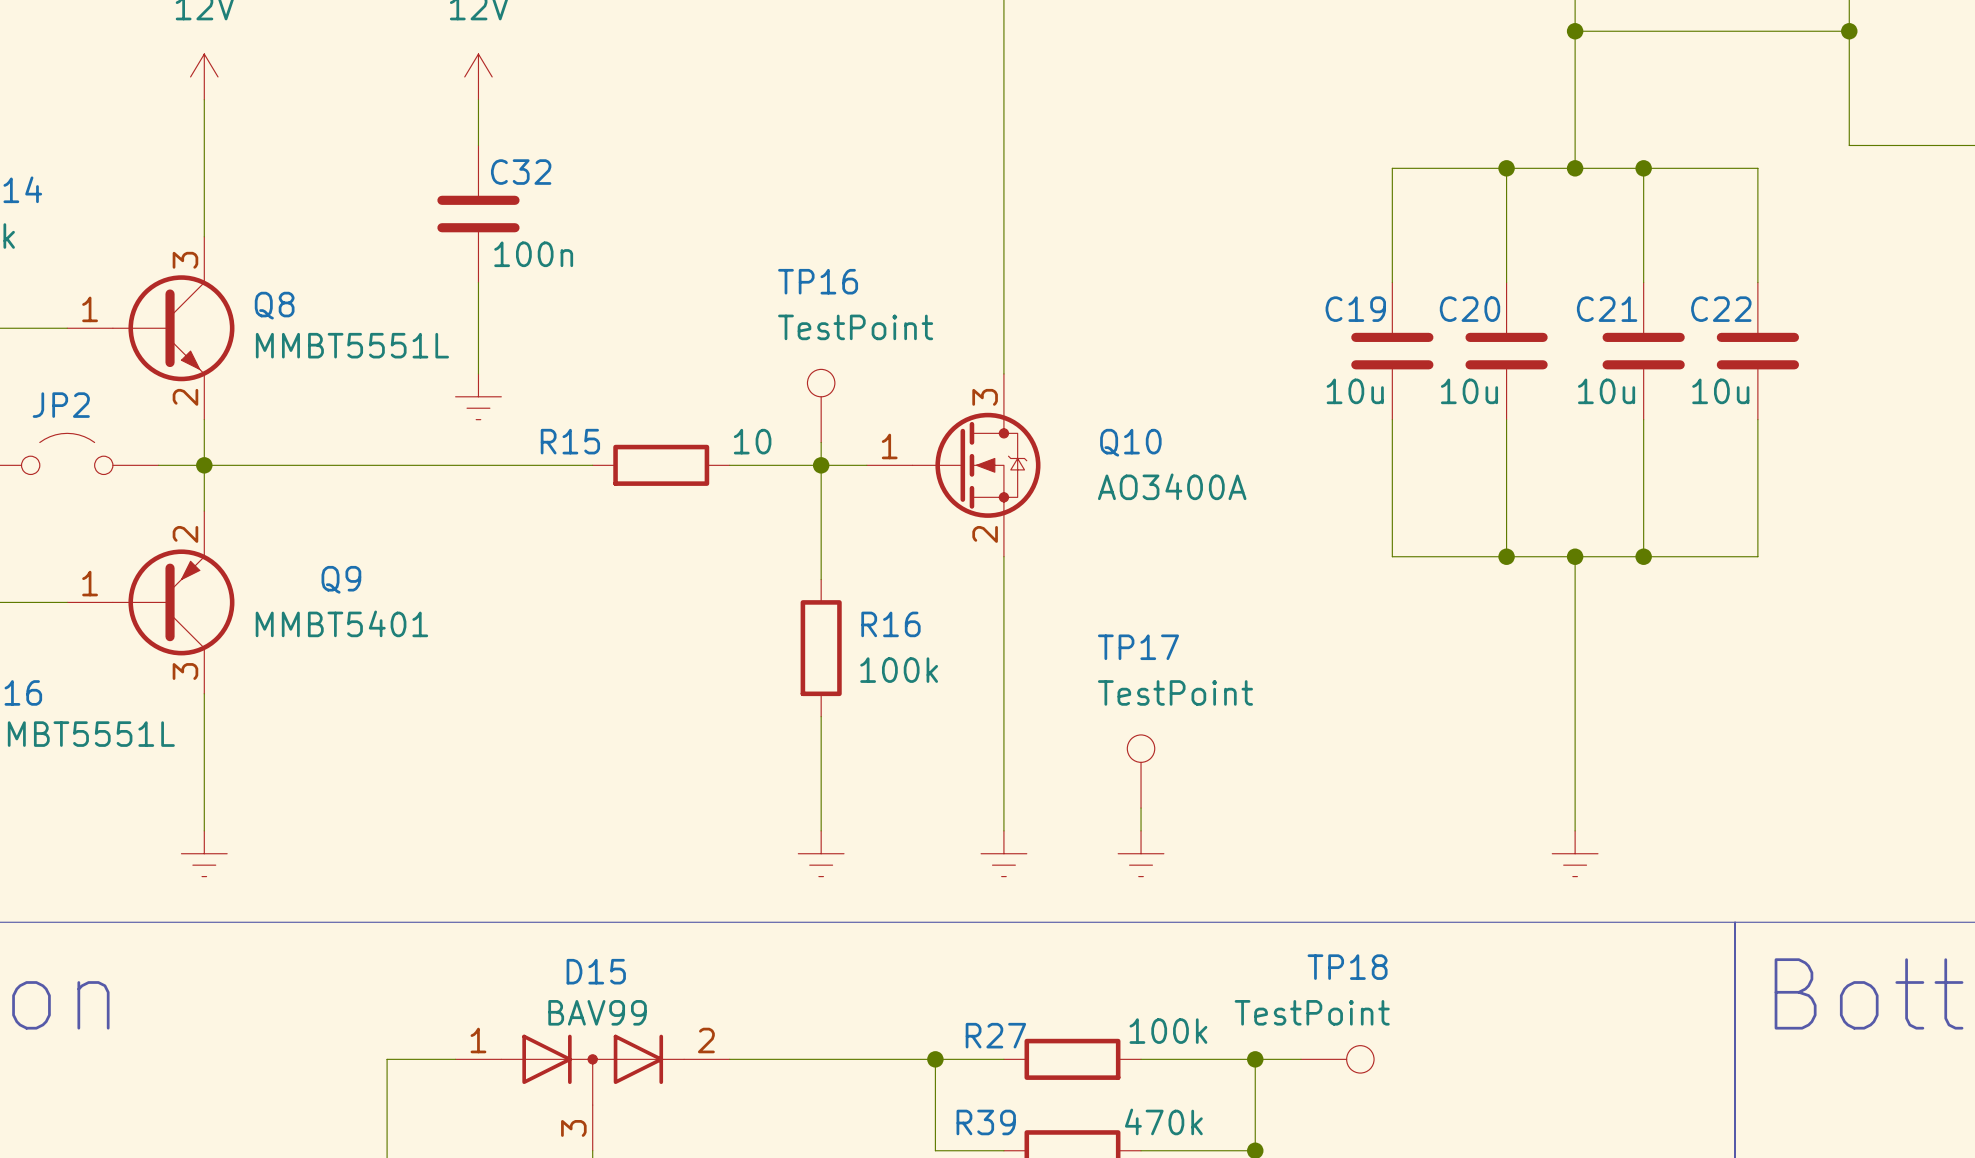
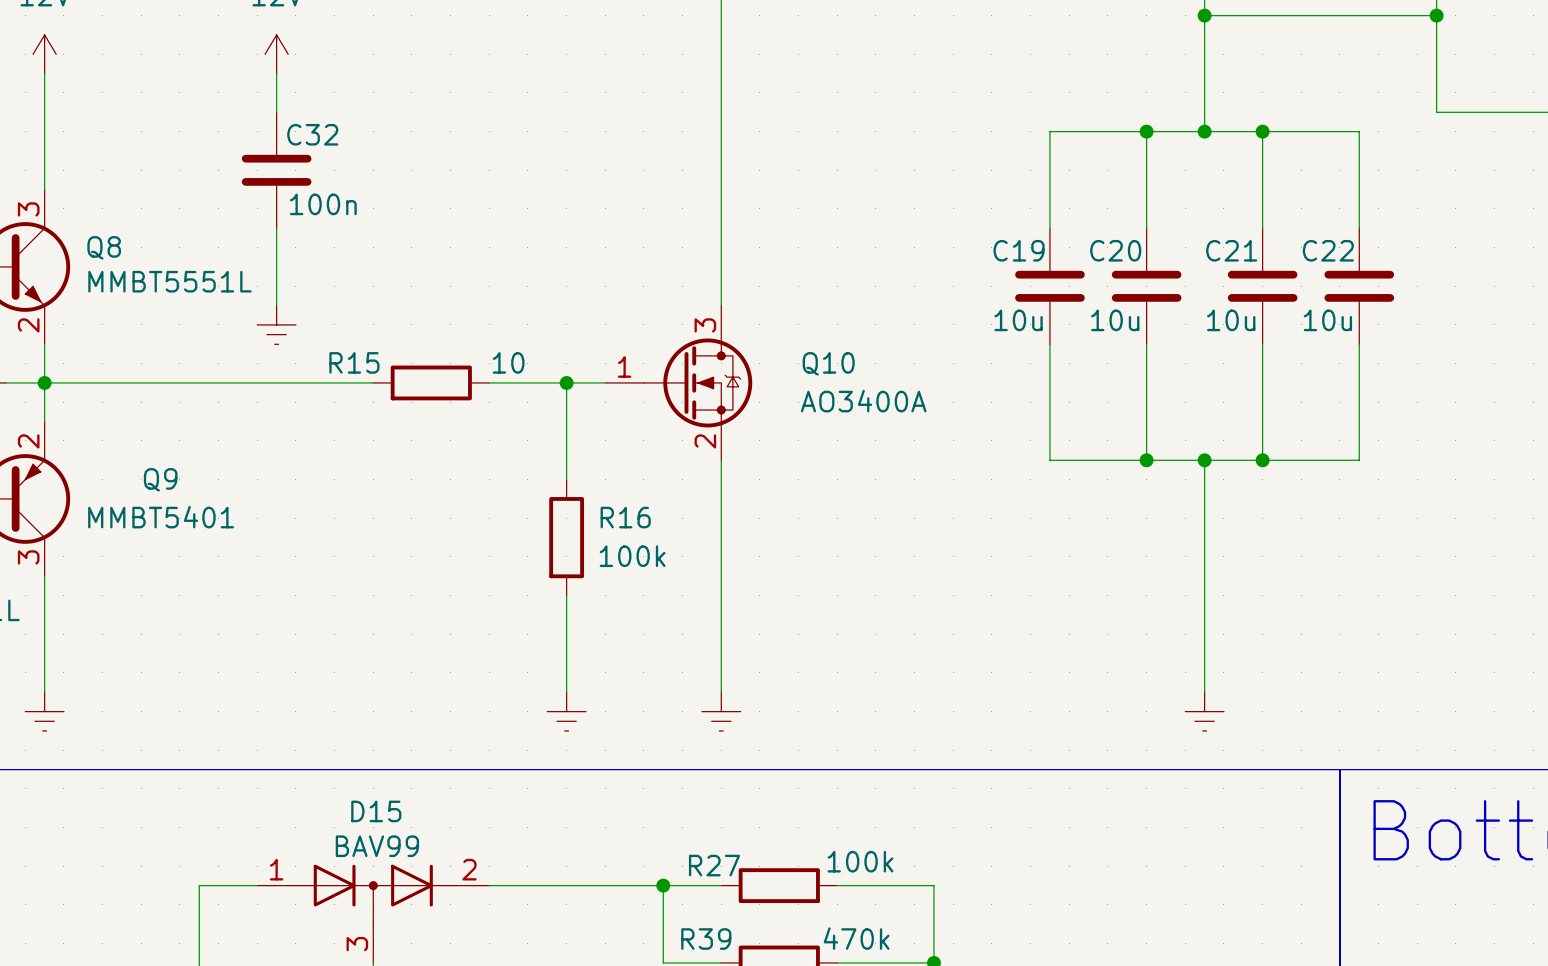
TP16: TestPoint (821, 405) -> none
wire: (821, 442) (821, 465) -> none
TP17: TestPoint (1141, 771) -> none
wire: (1141, 808) (1141, 830) -> none
power symbol: (1141, 853) -> none
wire: (1255, 1059) (1300, 1059) -> none
junction: (1255, 1059) -> none
TP18: TestPoint (1337, 1059) -> none

